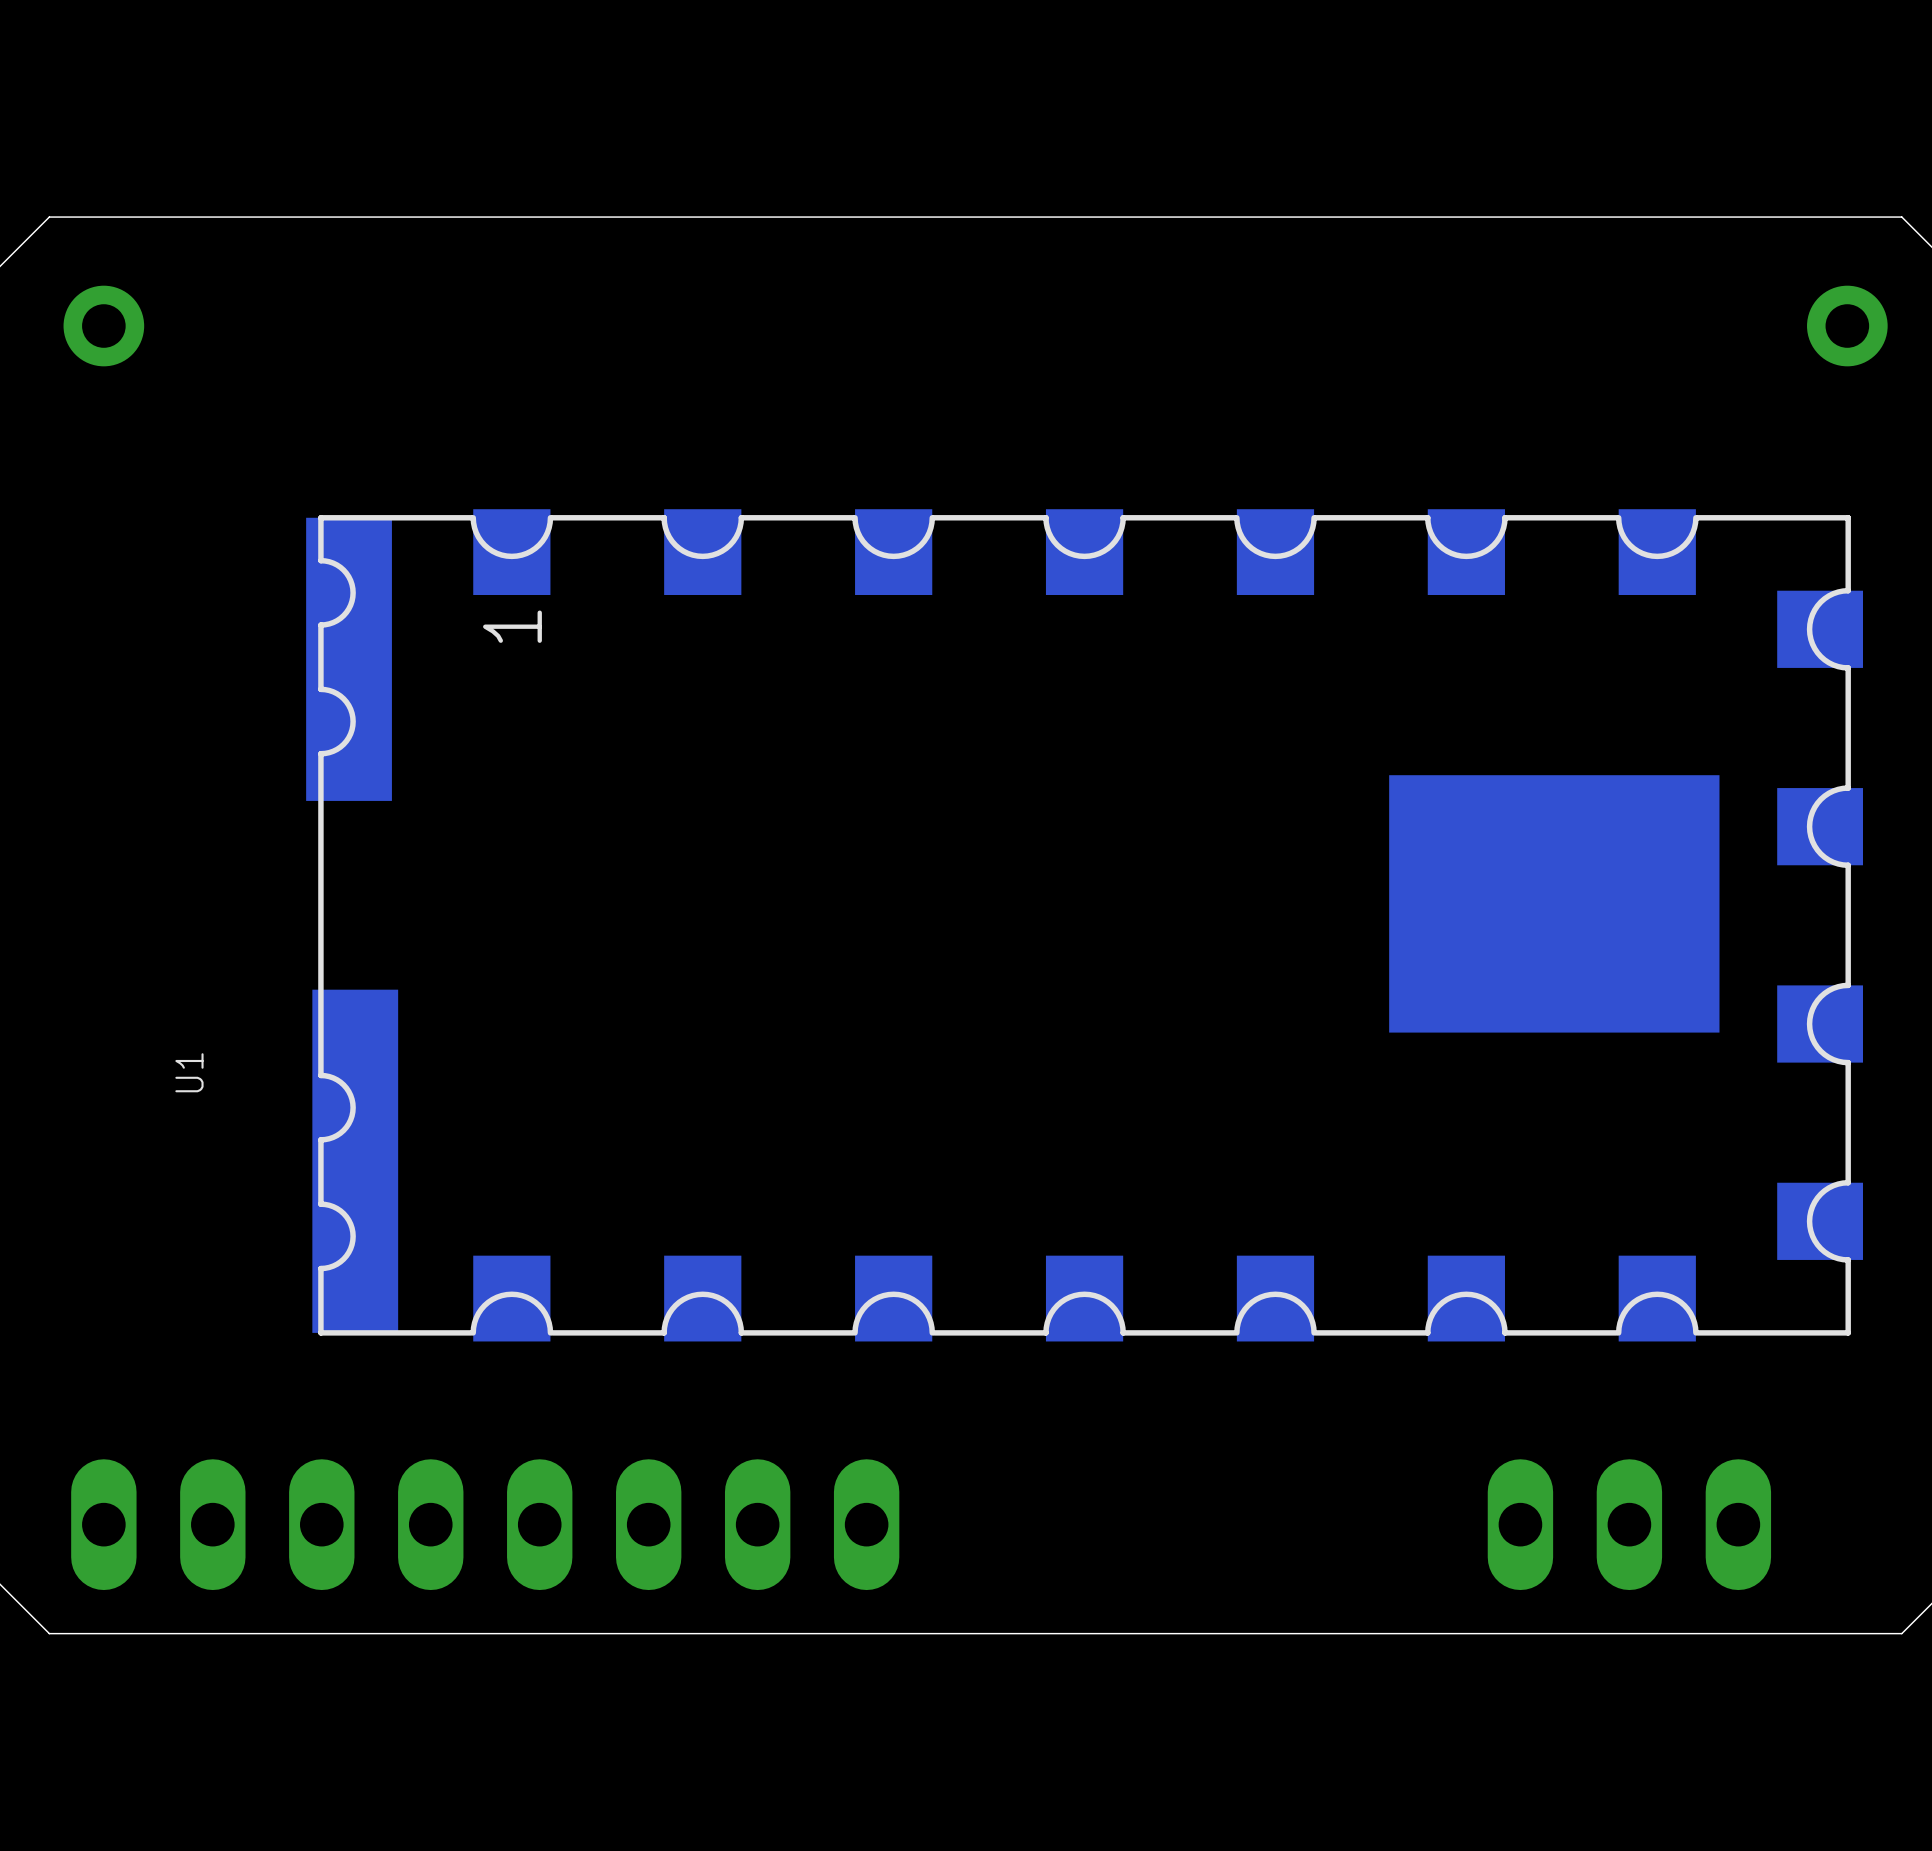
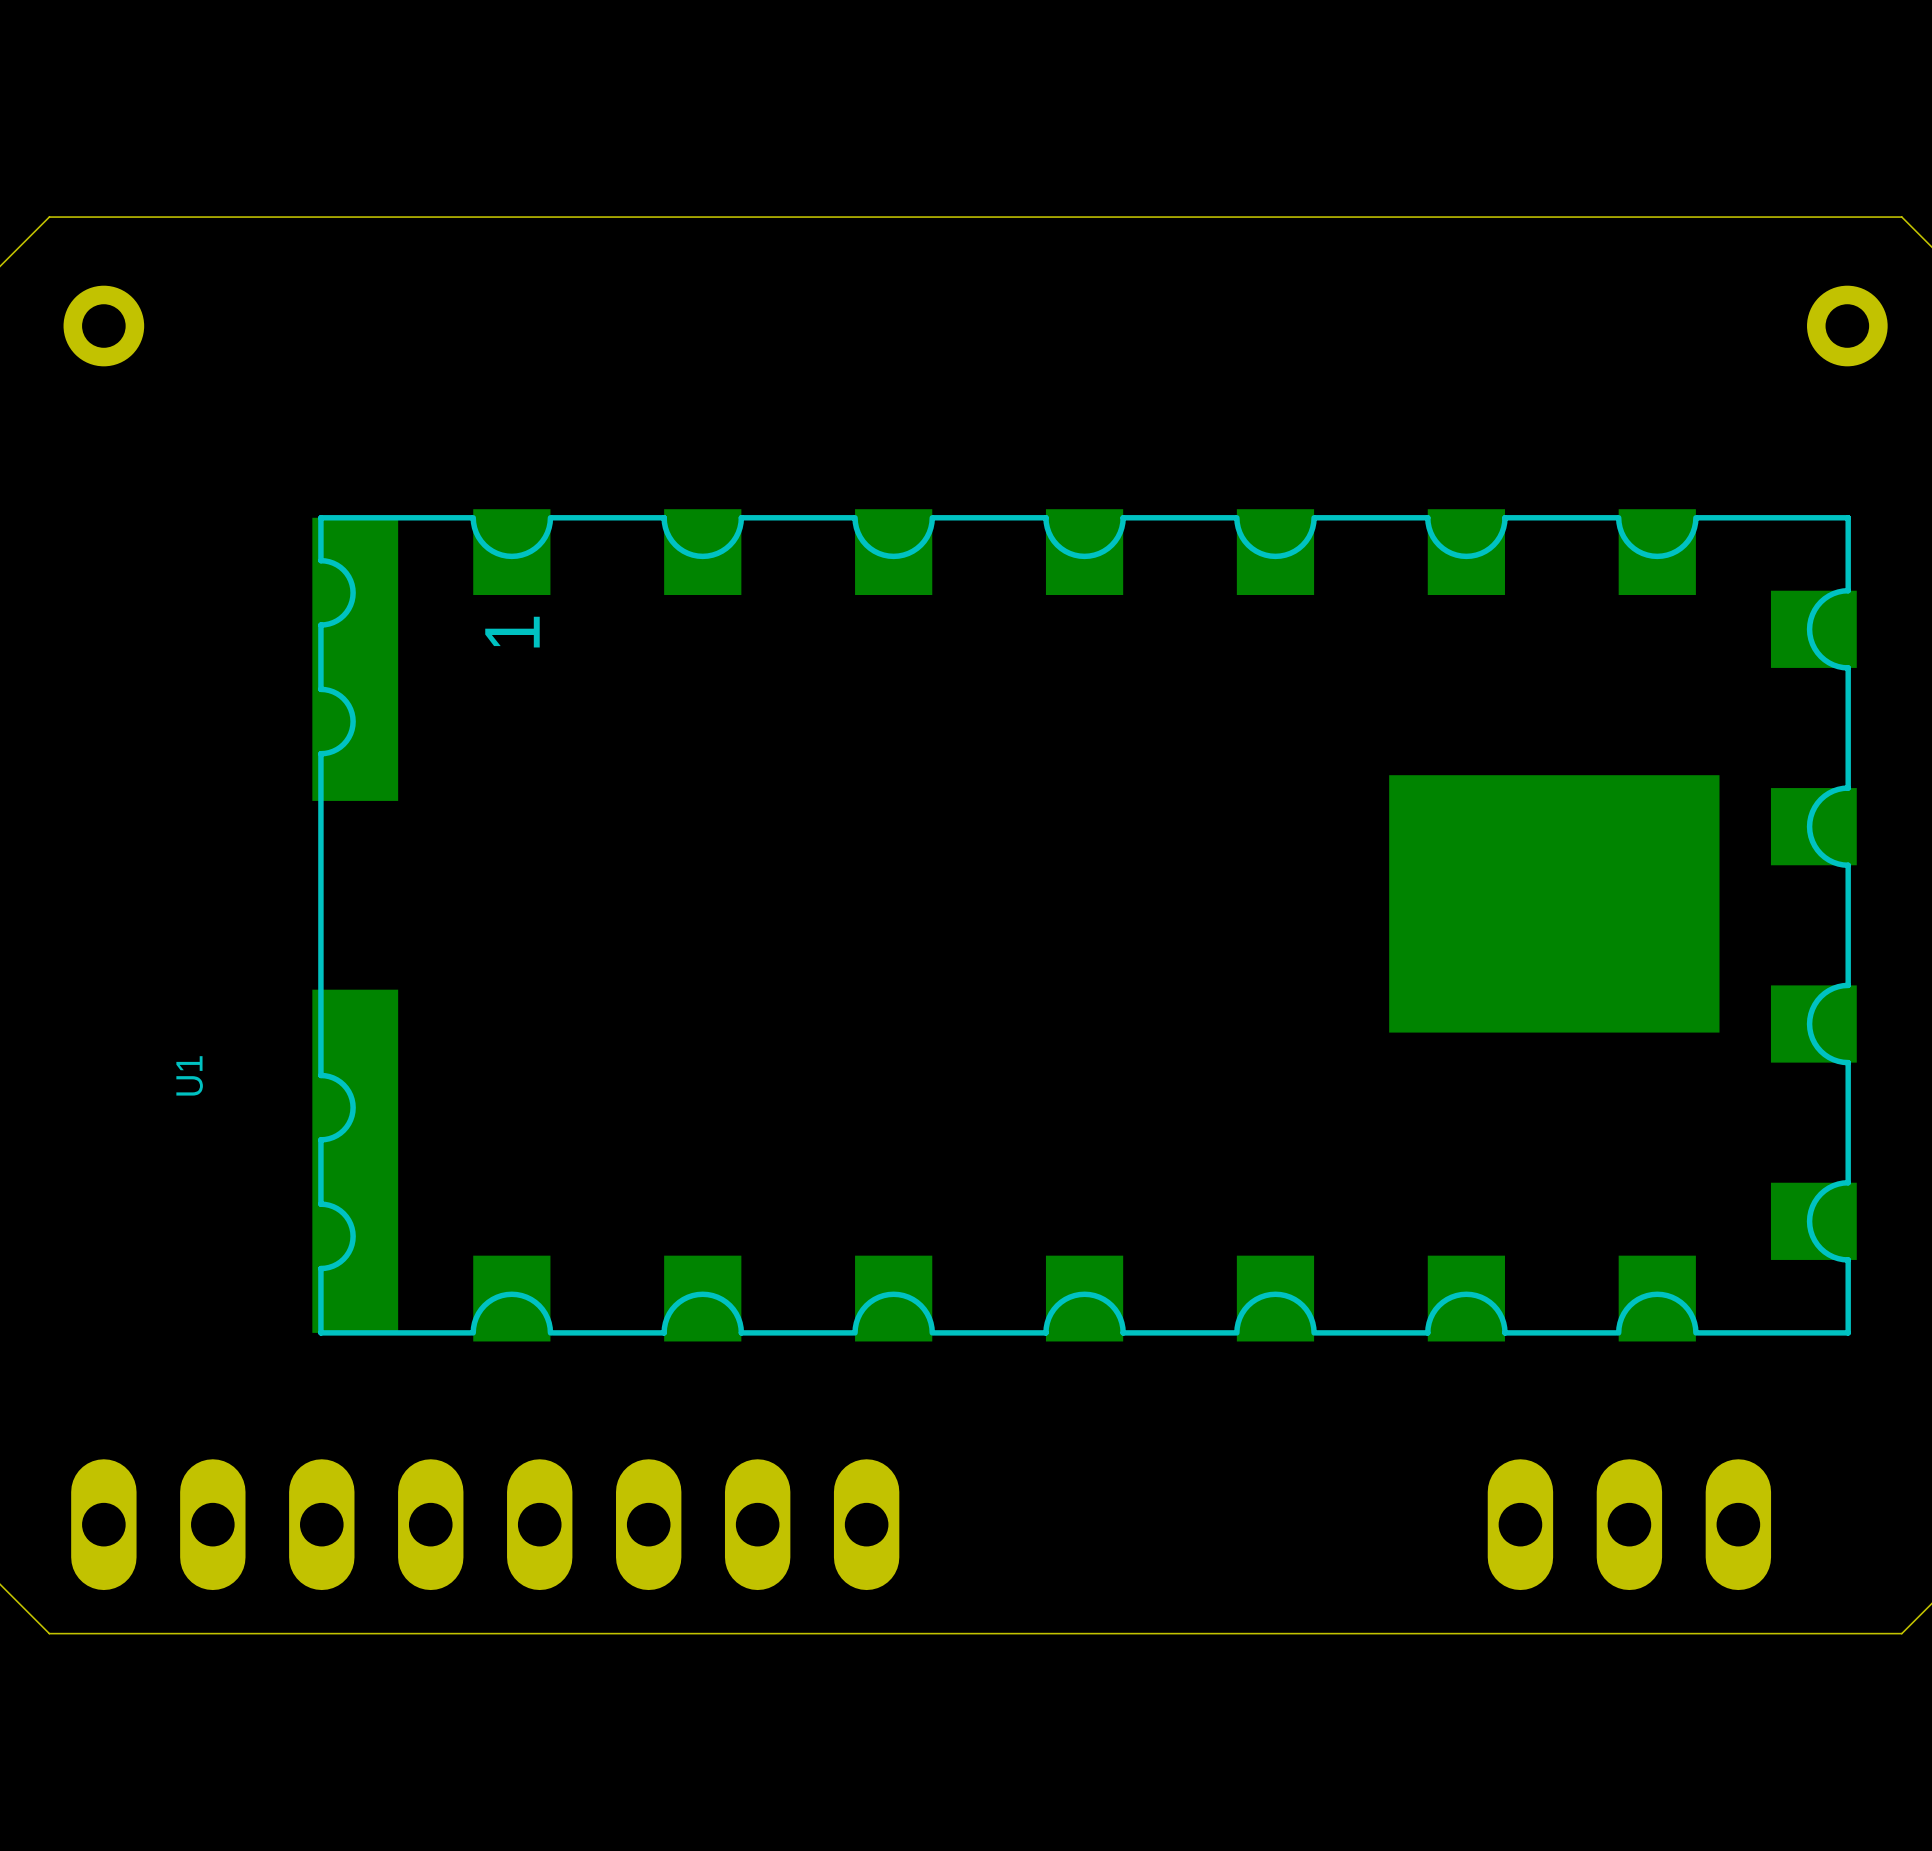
U1 footprint: [306, 509, 1863, 1342] -> [312, 509, 1857, 1342]

